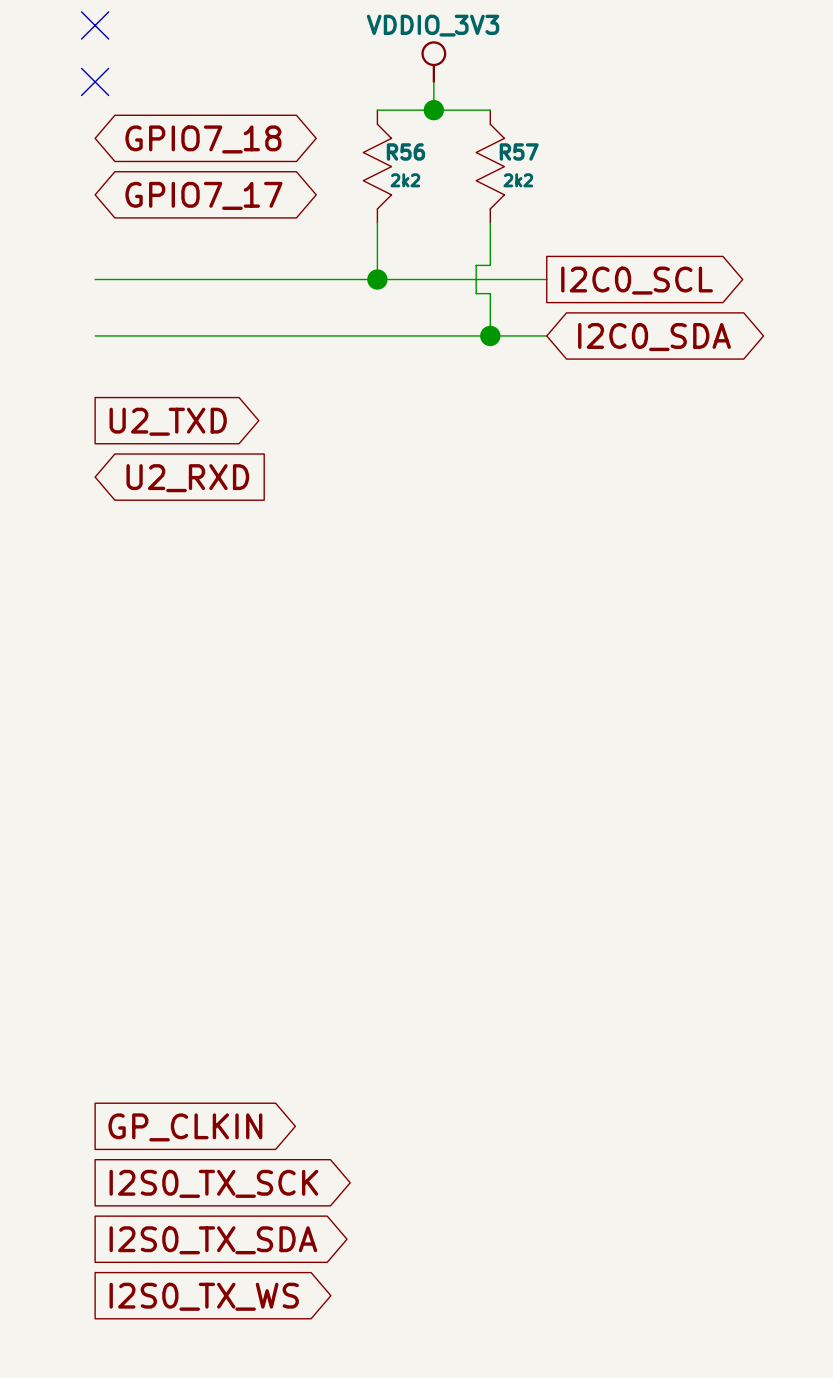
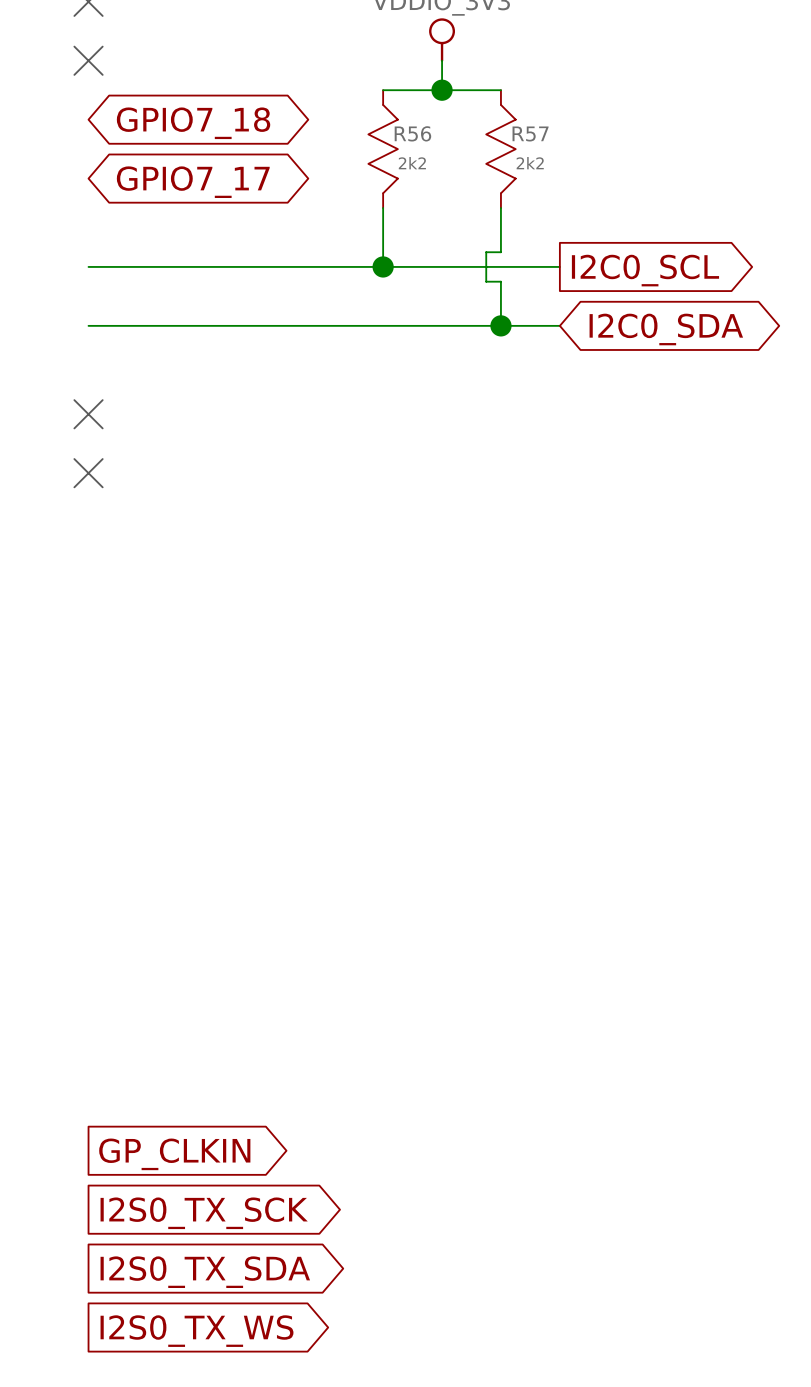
no-connect mark: none -> (88, 414)
global label: U2_TXD (168, 421) -> none
no-connect mark: none -> (88, 473)
global label: U2_RXD (187, 478) -> none

